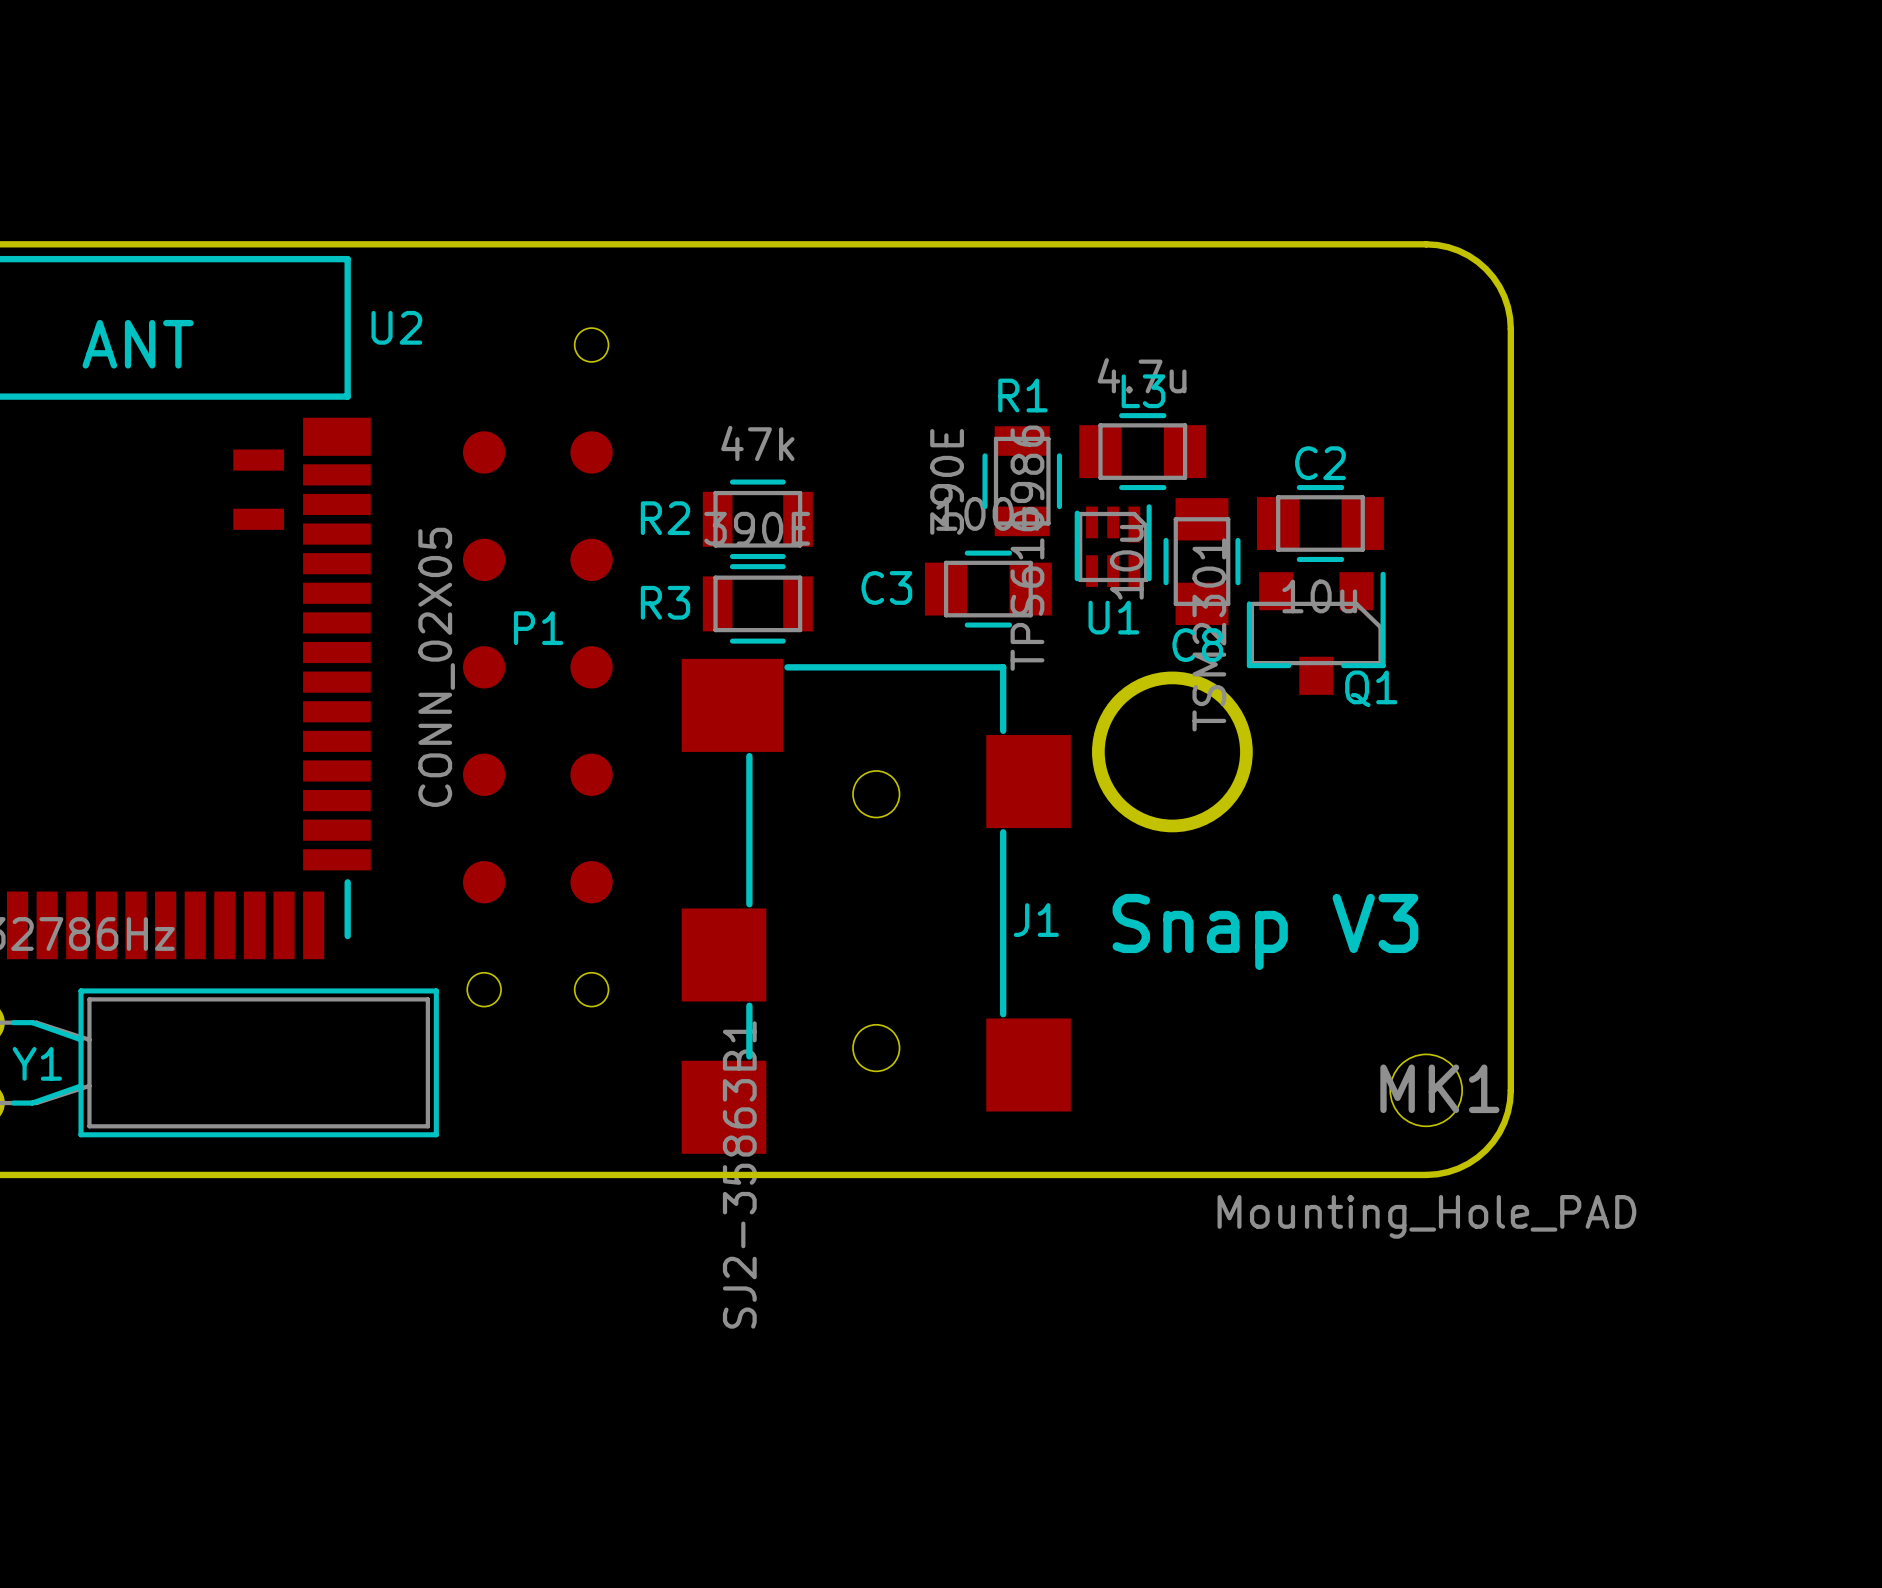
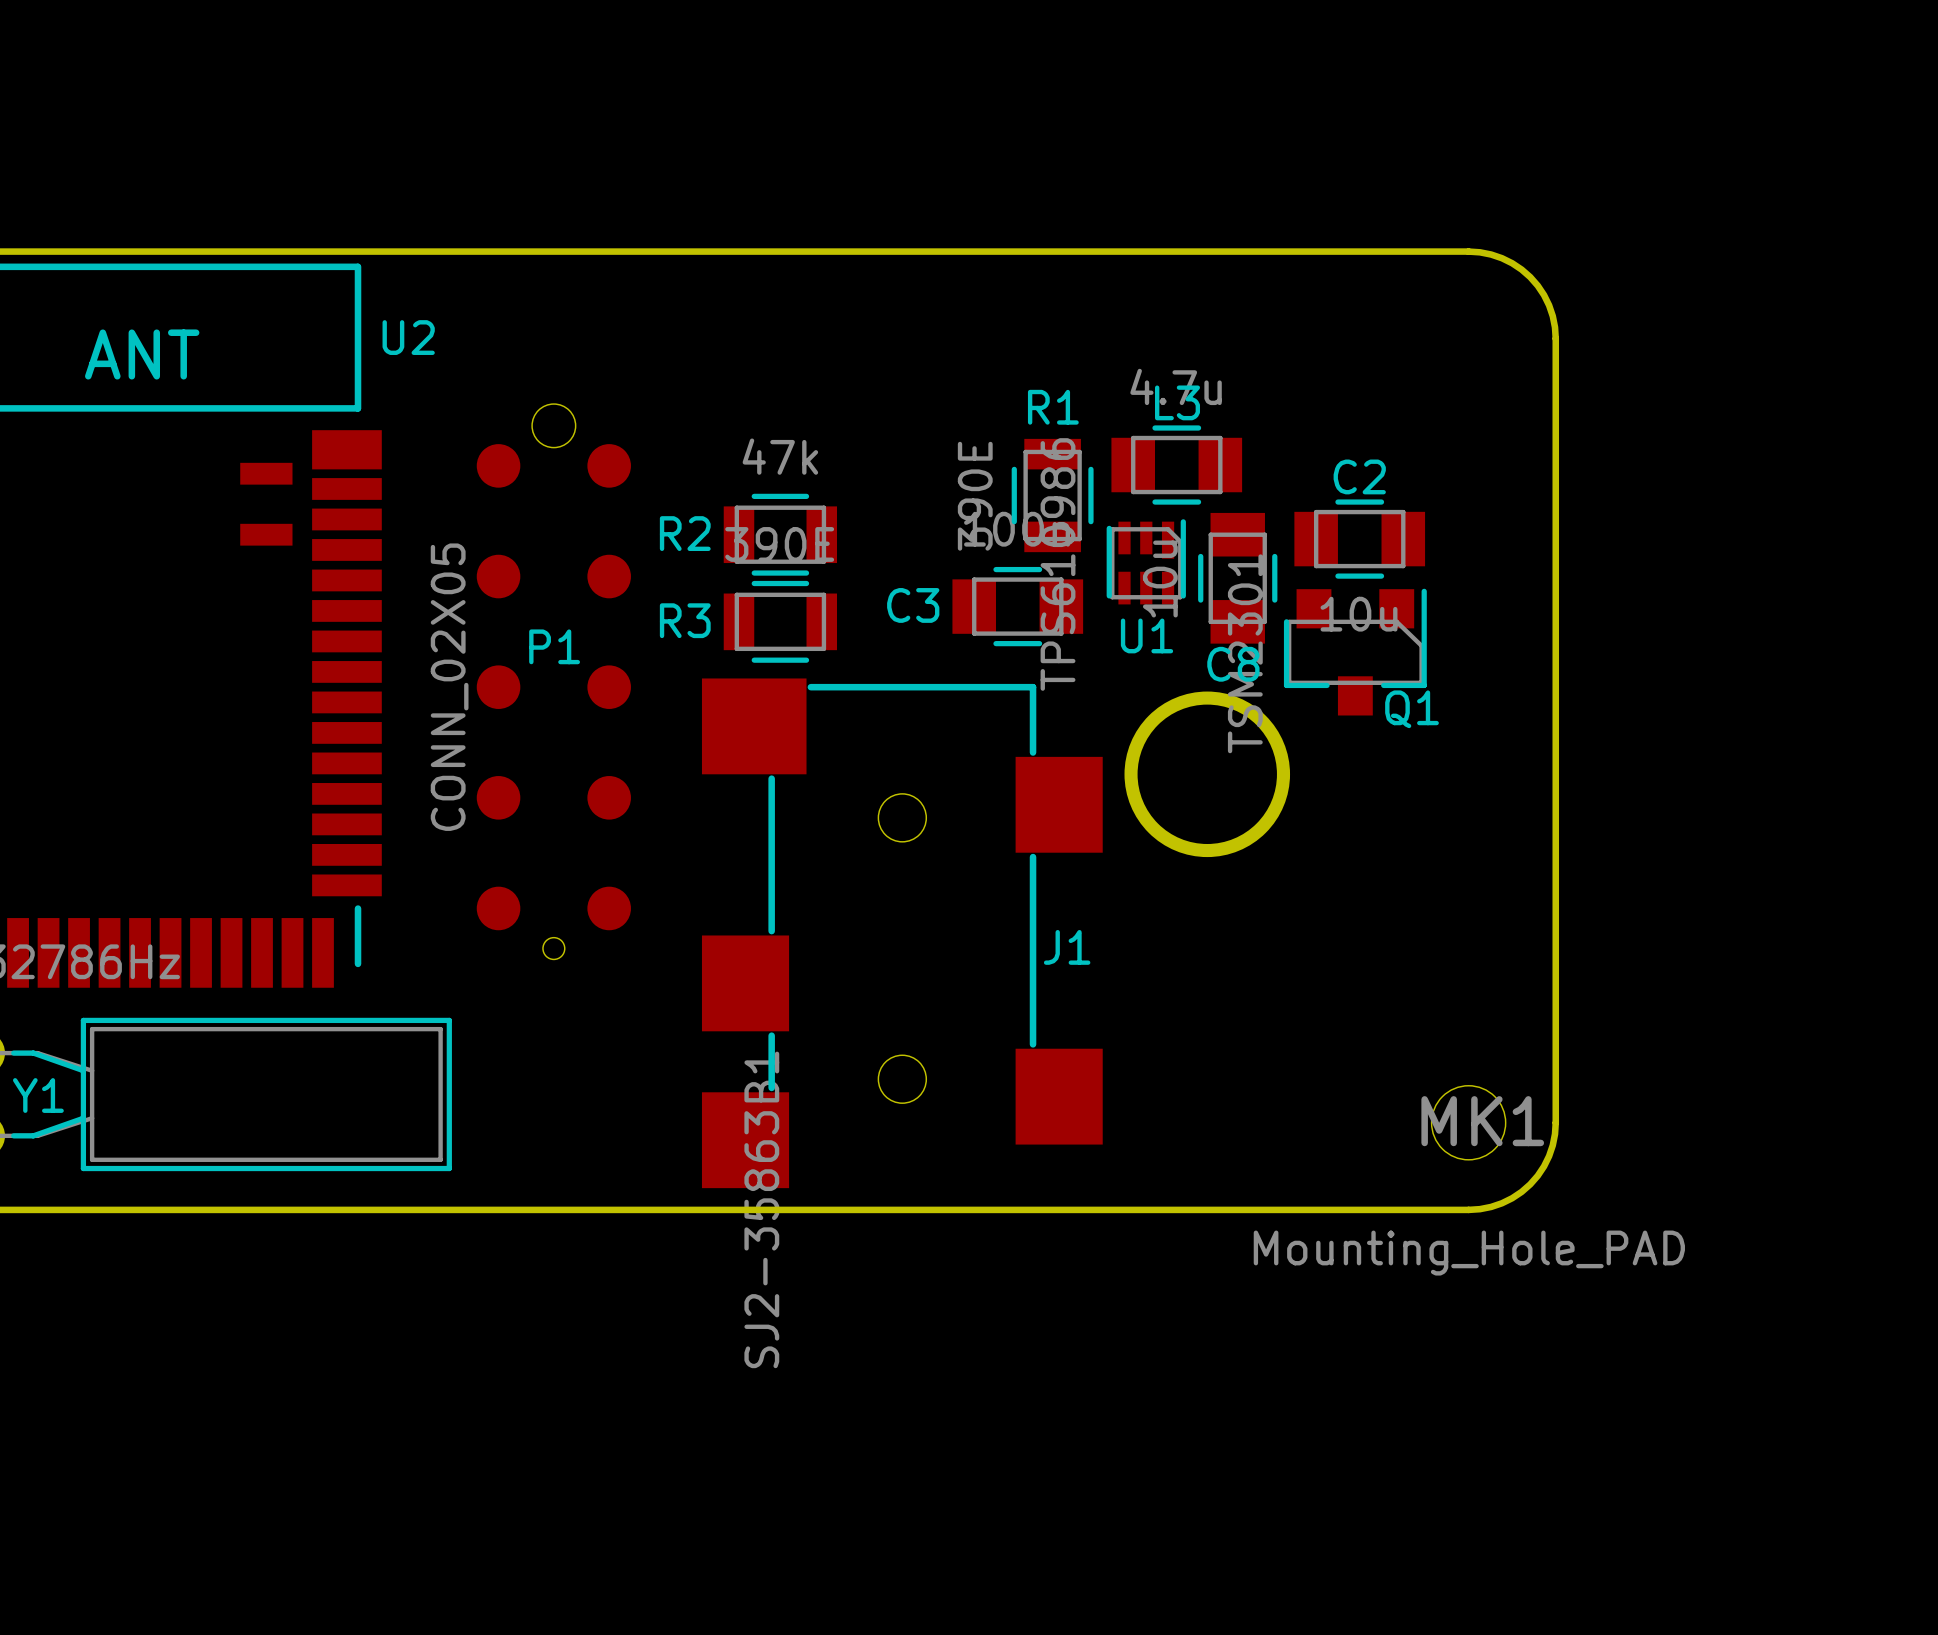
P1 footprint: [462, 328, 613, 1007] -> [476, 404, 631, 960]
text: Snap V3 (1265, 931) -> none

